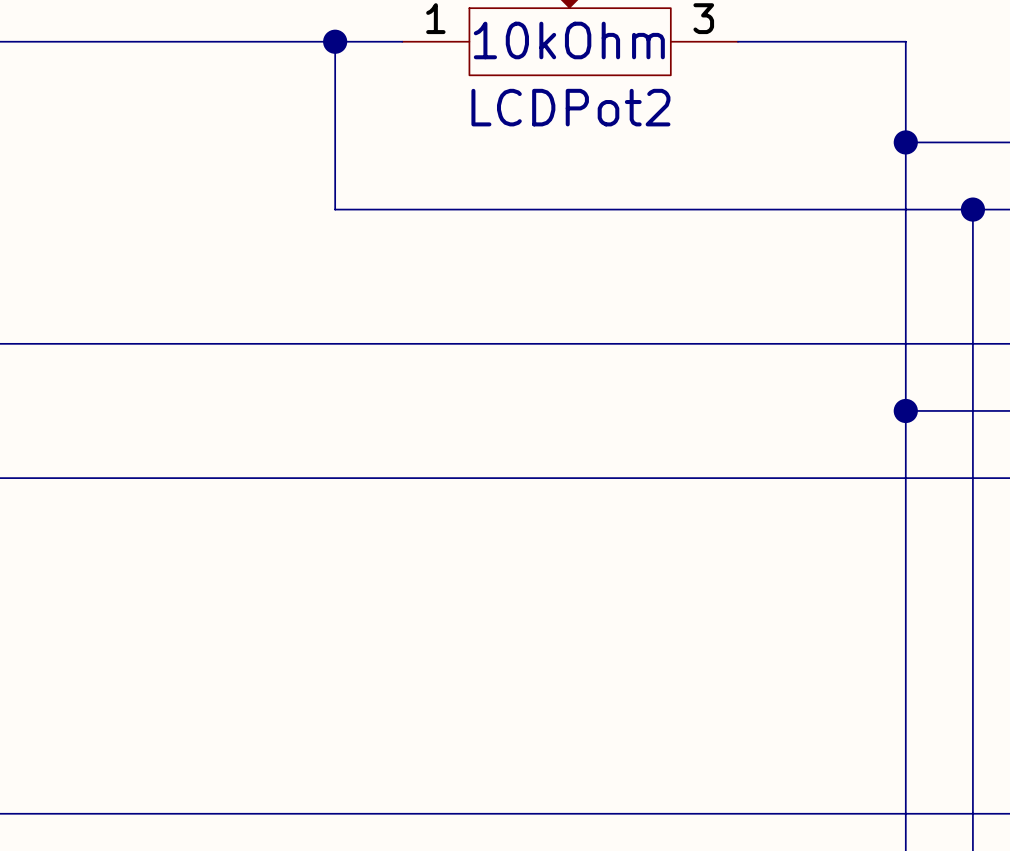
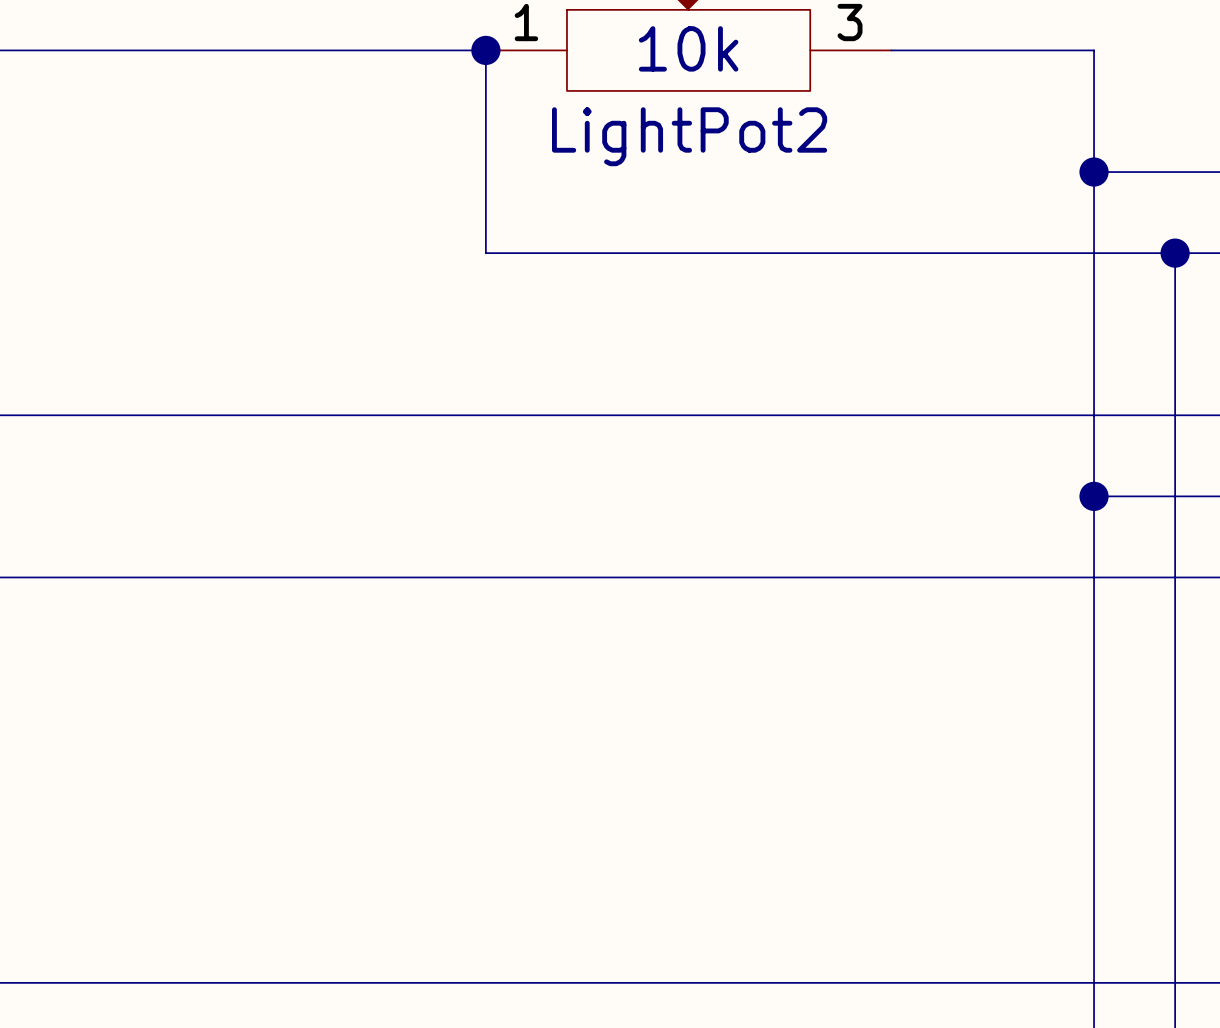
LCDPot2 value: 10kOhm (569, 40) -> 10k (688, 48)
wire: (335, 41) (335, 209) (402, 209) -> (485, 50) (485, 253)
junction position: (335, 41) -> (485, 50)
LCDPot2 name: LCDPot2 (570, 107) -> LightPot2 (689, 136)

